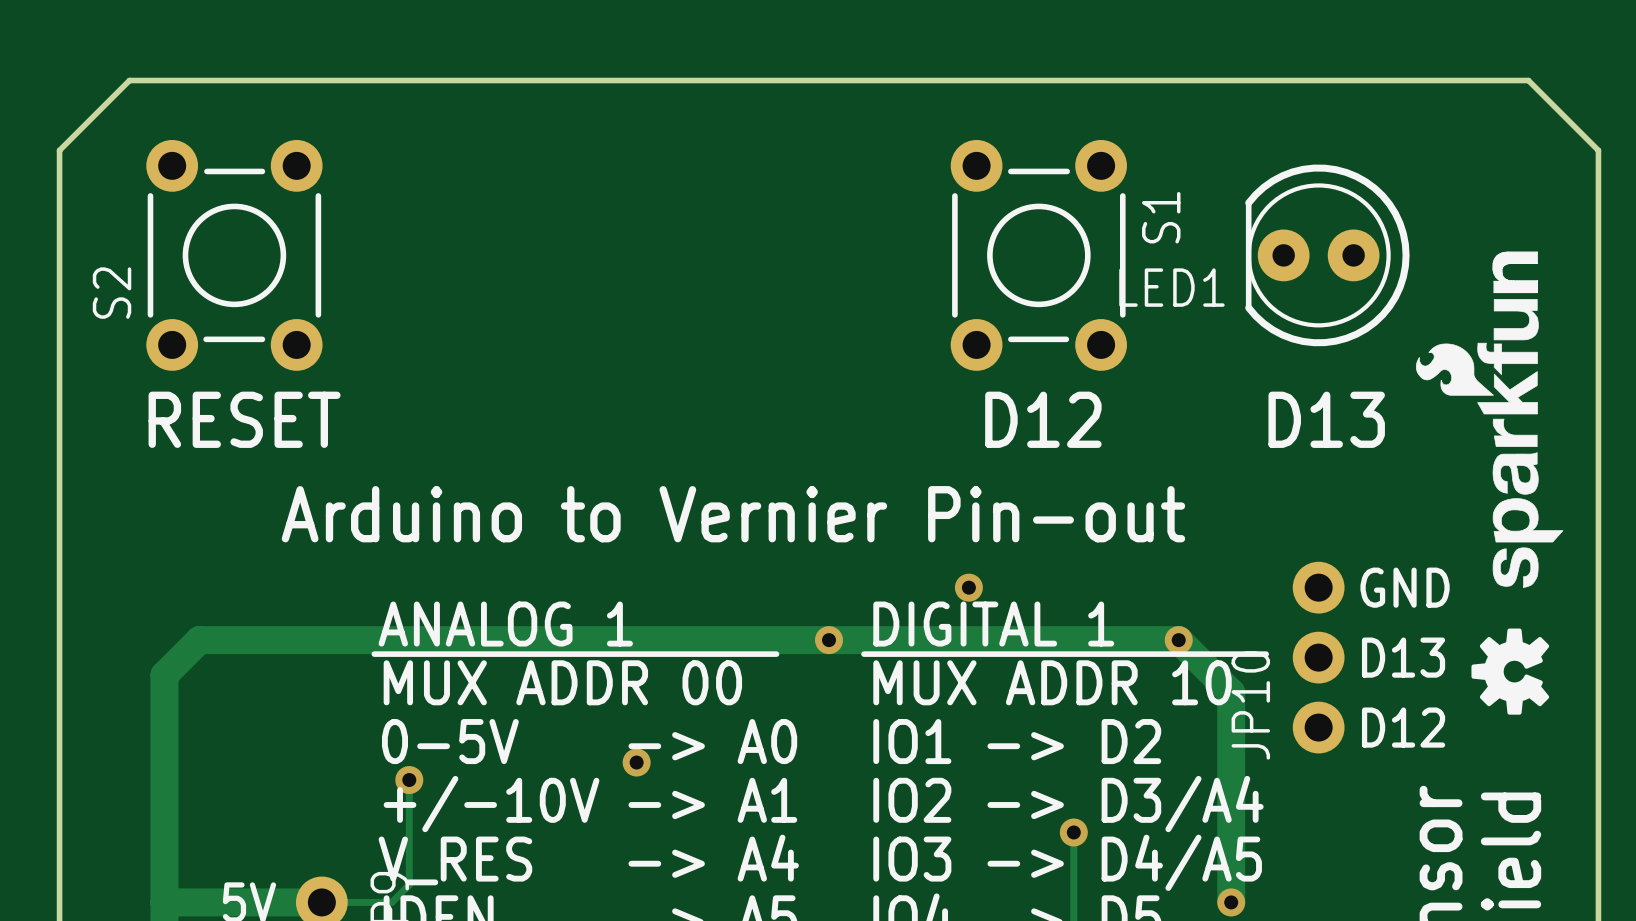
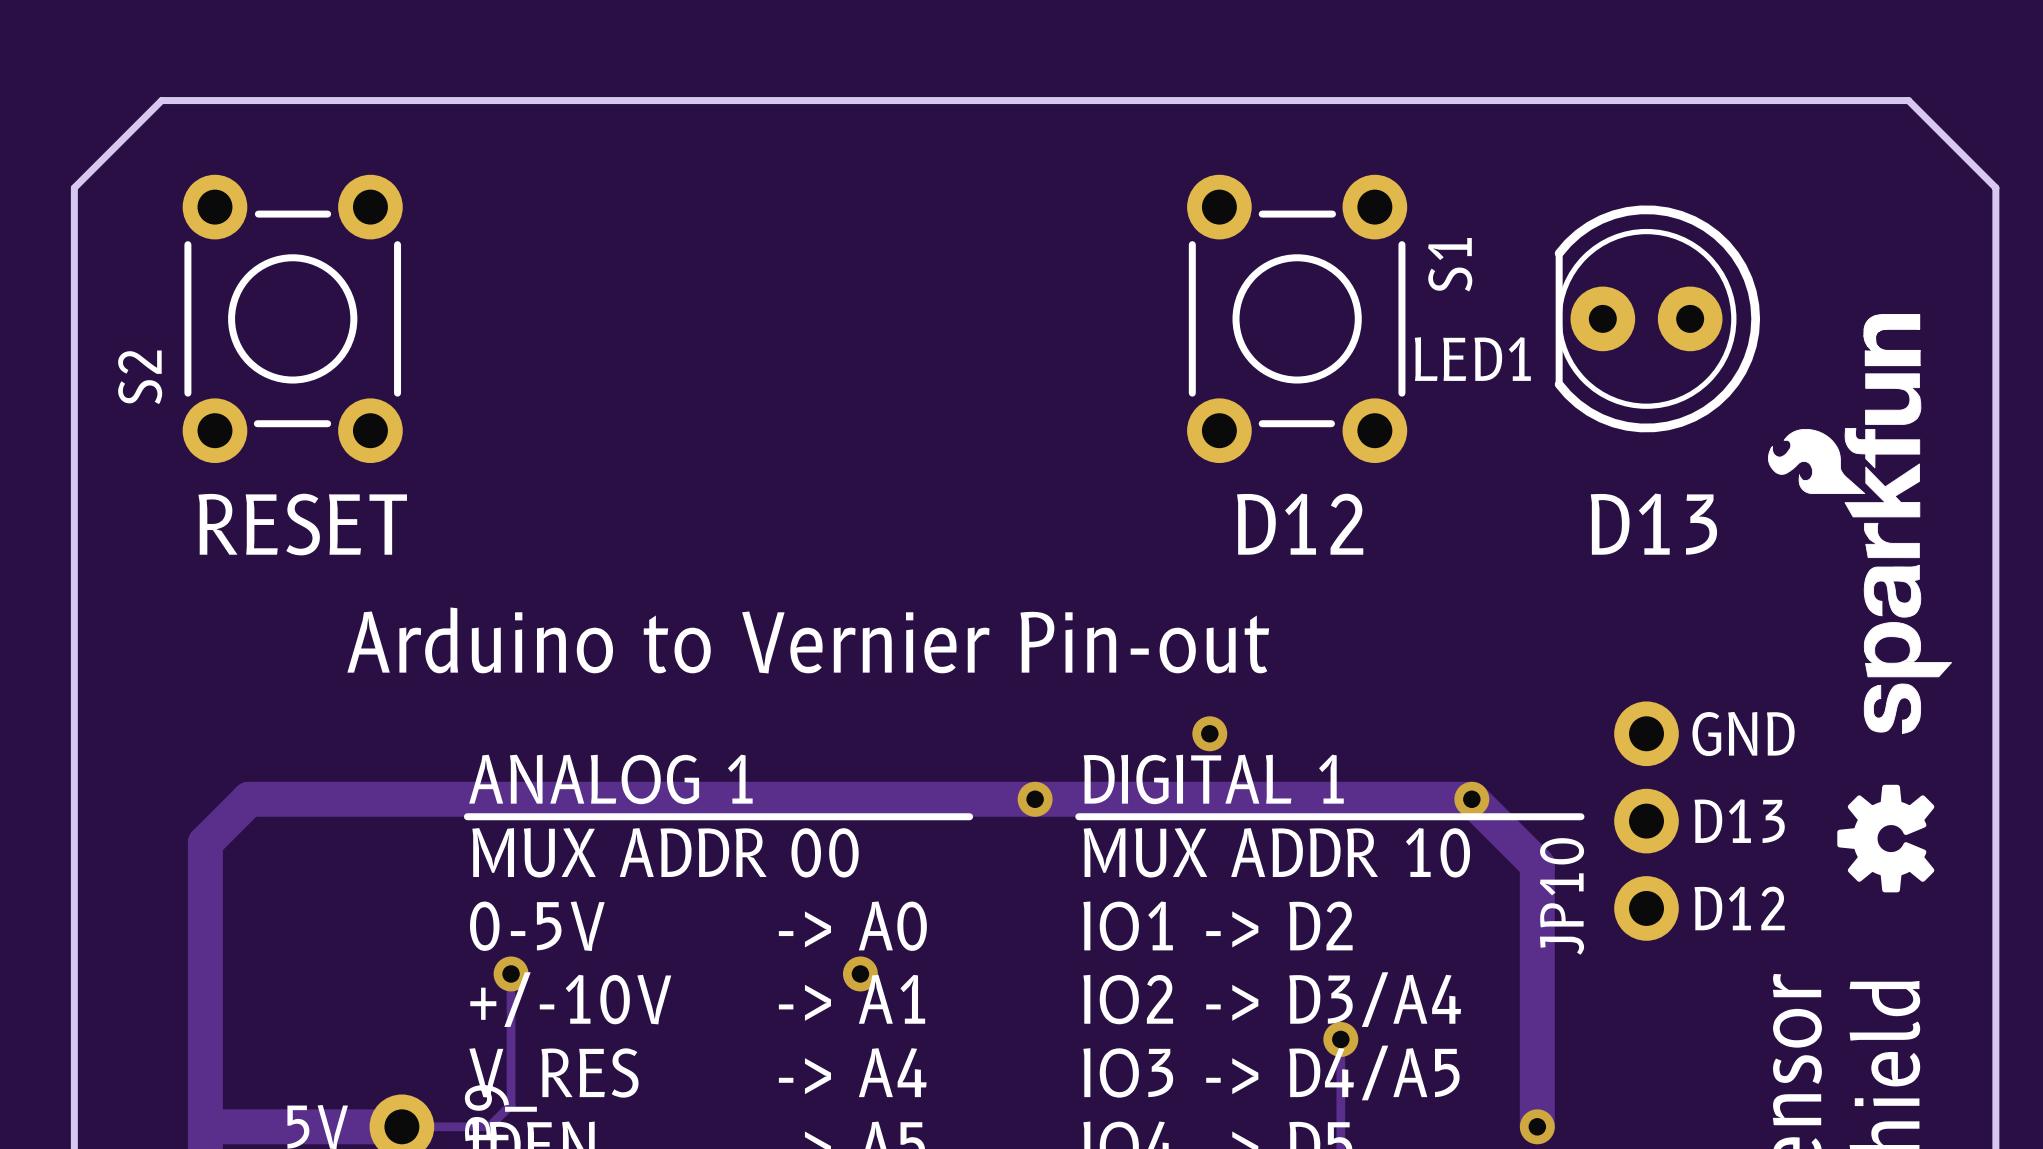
via position: (636, 762) -> (860, 973)

